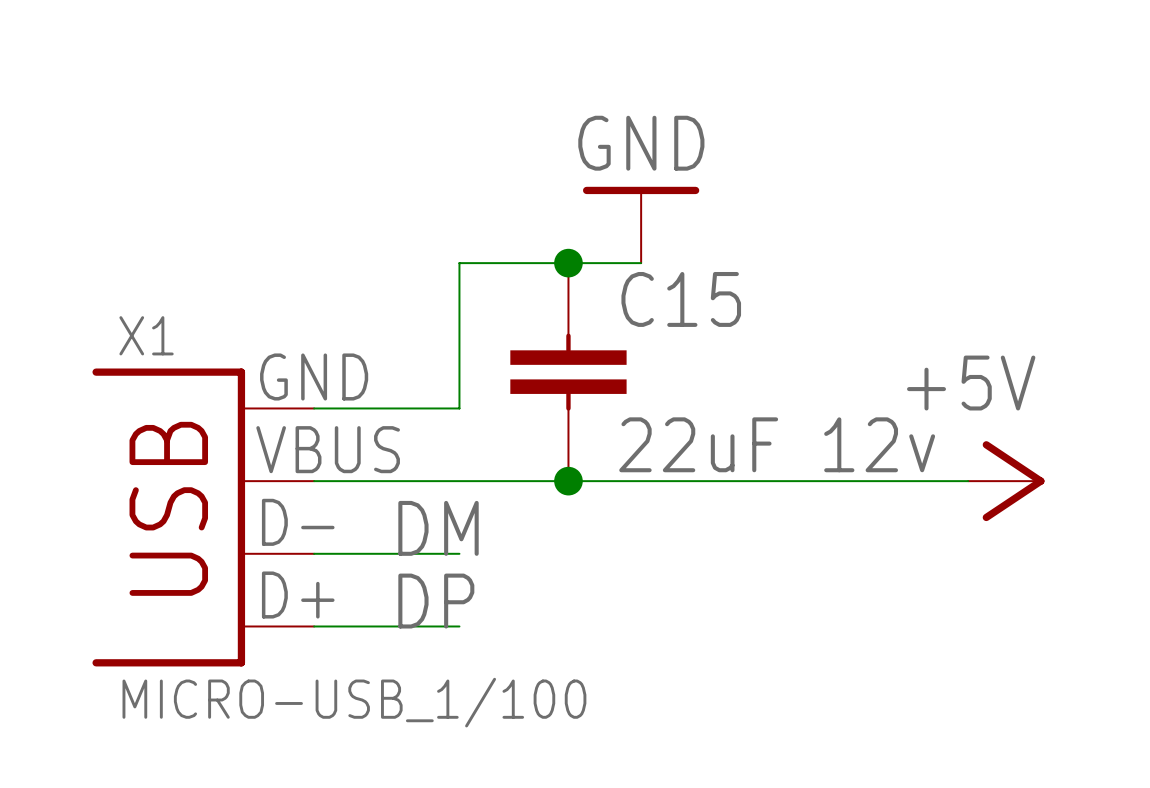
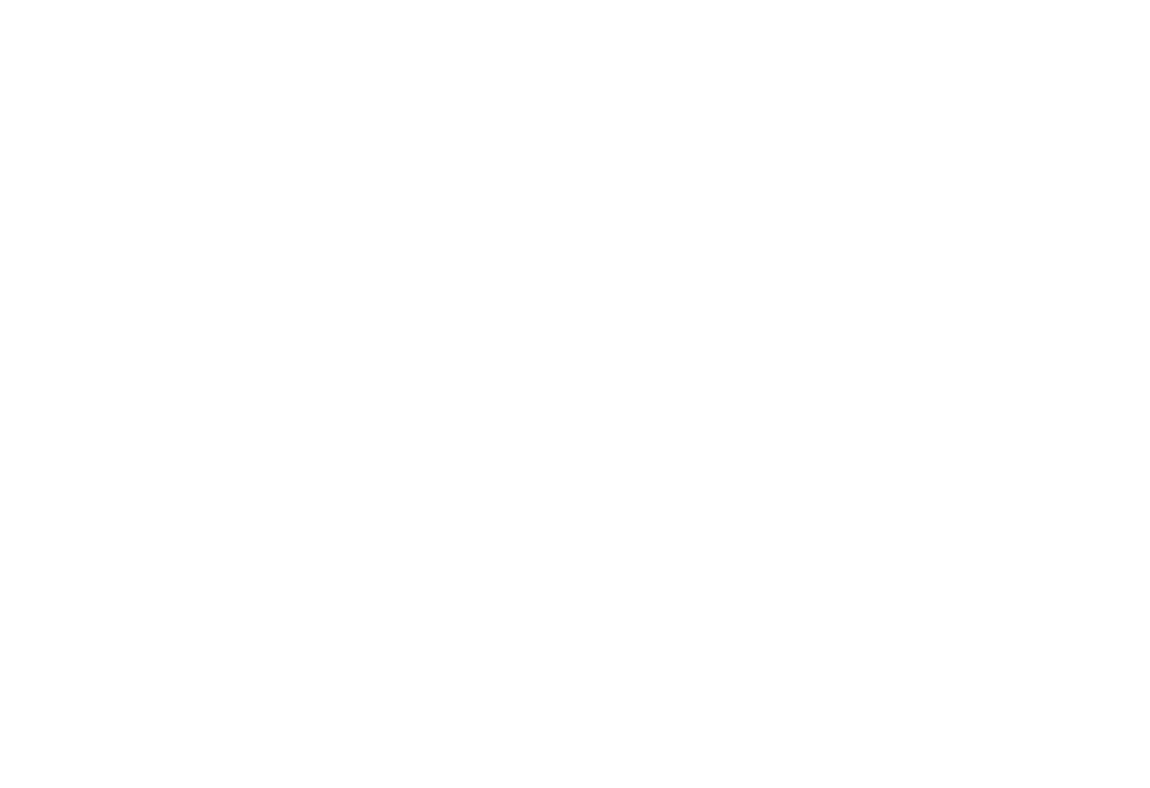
power symbol: GND (641, 224) -> none
junction: (568, 263) -> none
wire: (641, 263) (459, 263) (459, 408) (314, 408) -> none
C15: 22uF 12v (568, 372) -> none
wire: (314, 481) (968, 481) -> none
junction: (568, 481) -> none
power symbol: +5V (1006, 481) -> none
X1: MICRO-USB_1/100 (203, 517) -> none
label: DM (438, 528) -> none
wire: (314, 553) (459, 553) -> none
label: DP (436, 601) -> none
wire: (314, 626) (459, 626) -> none

